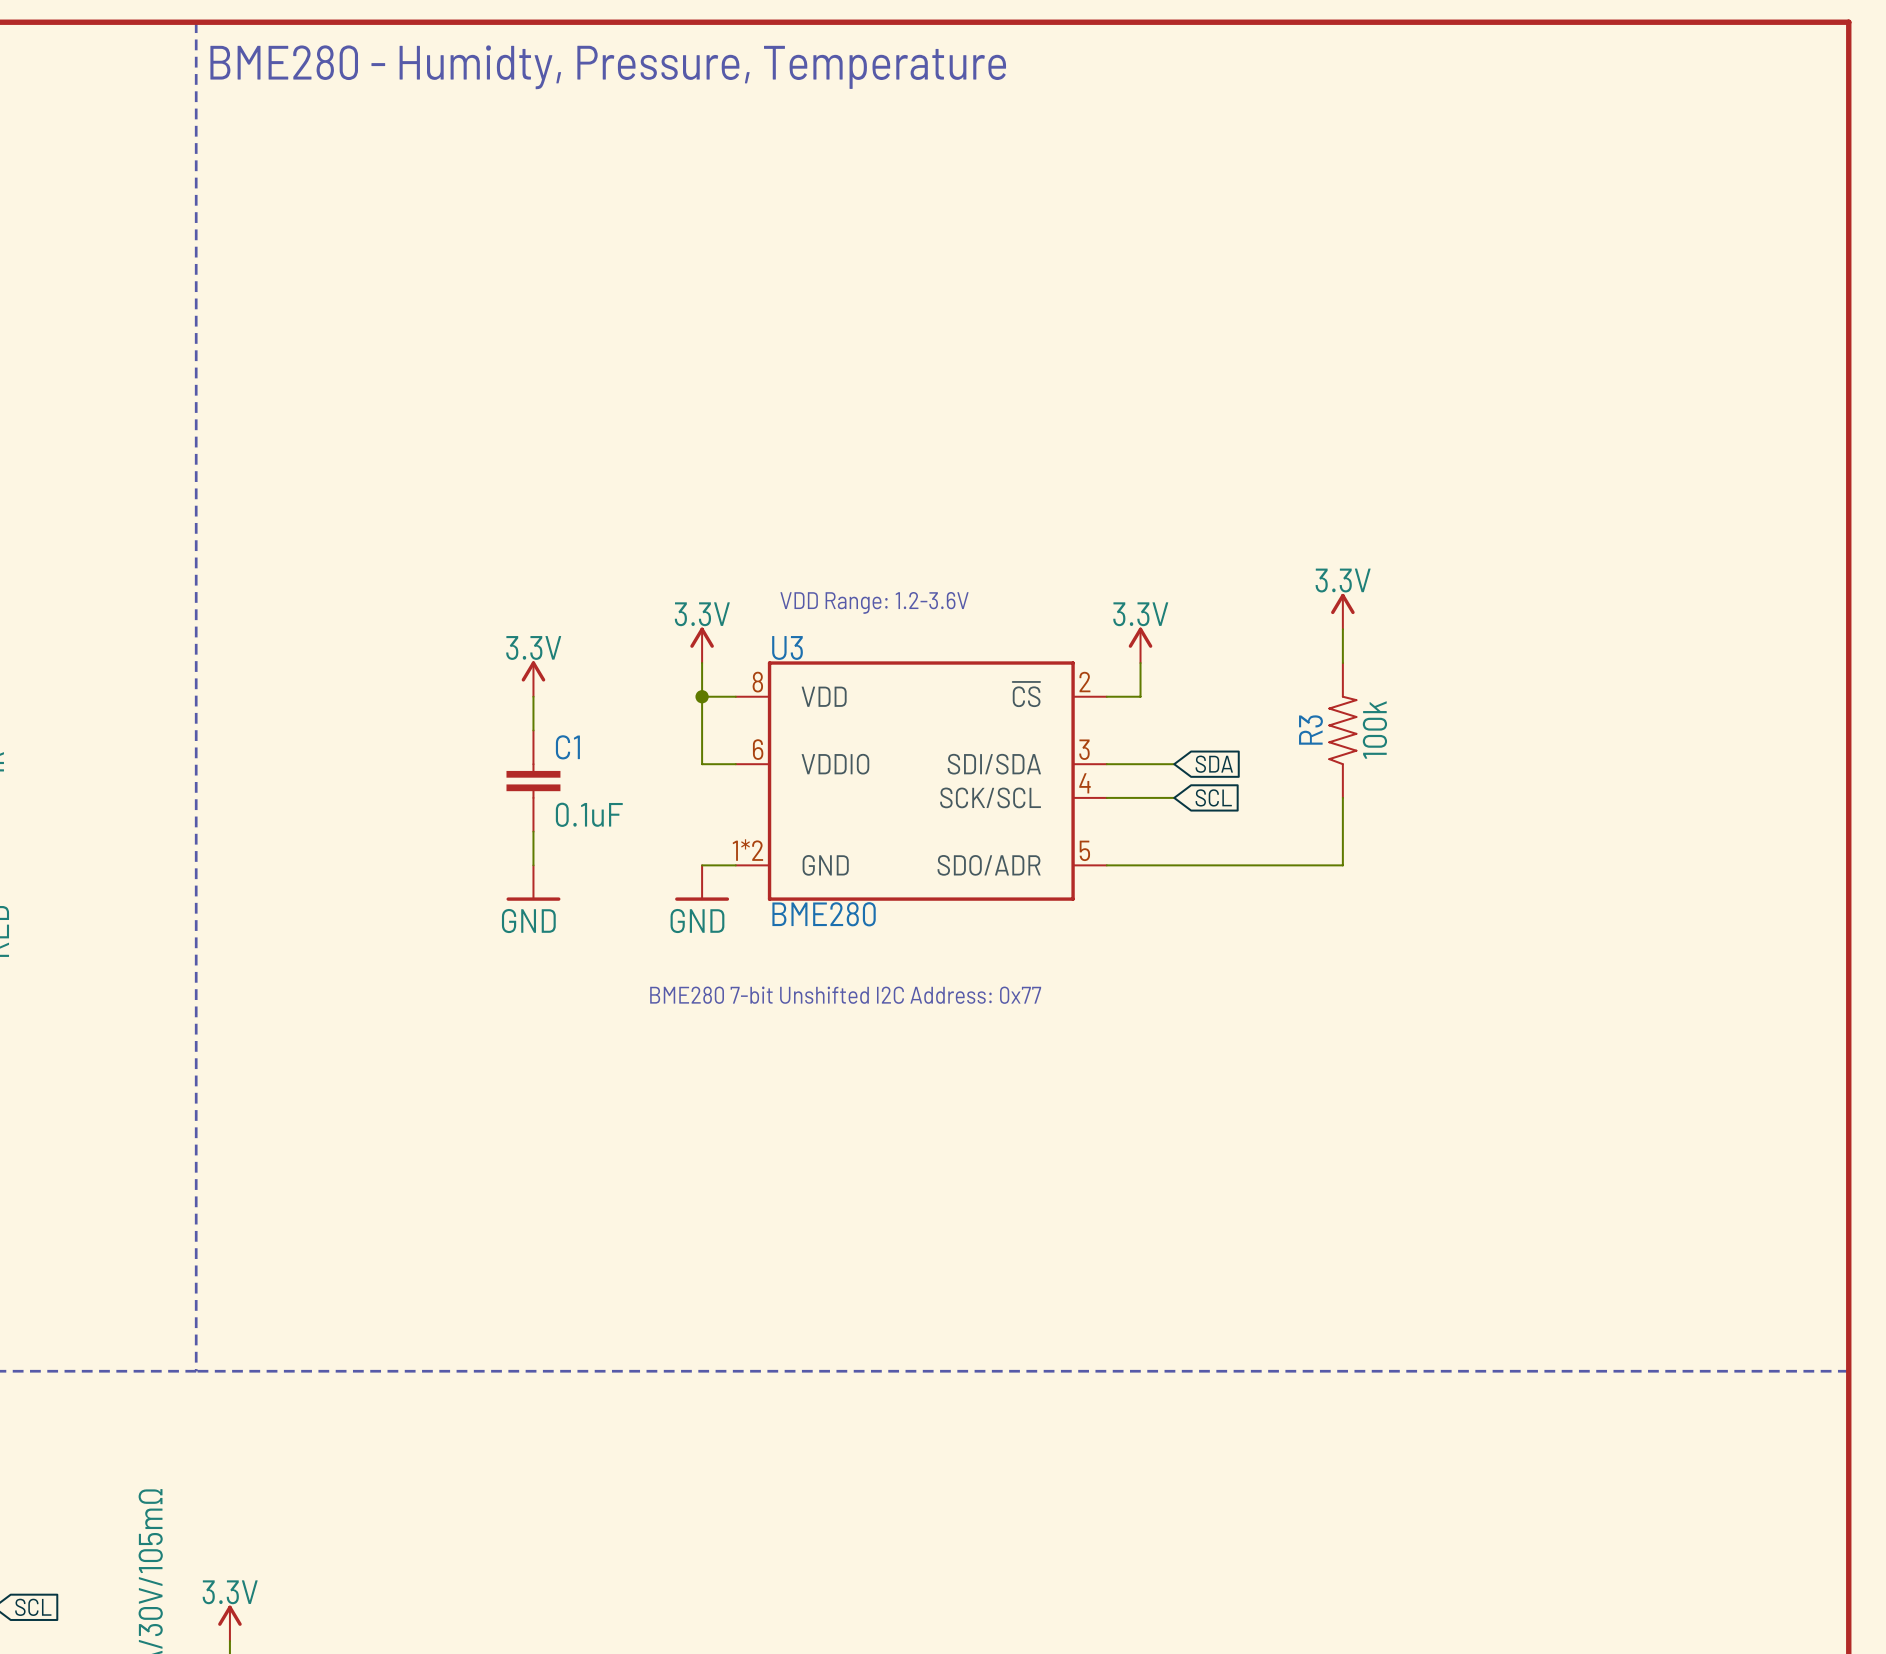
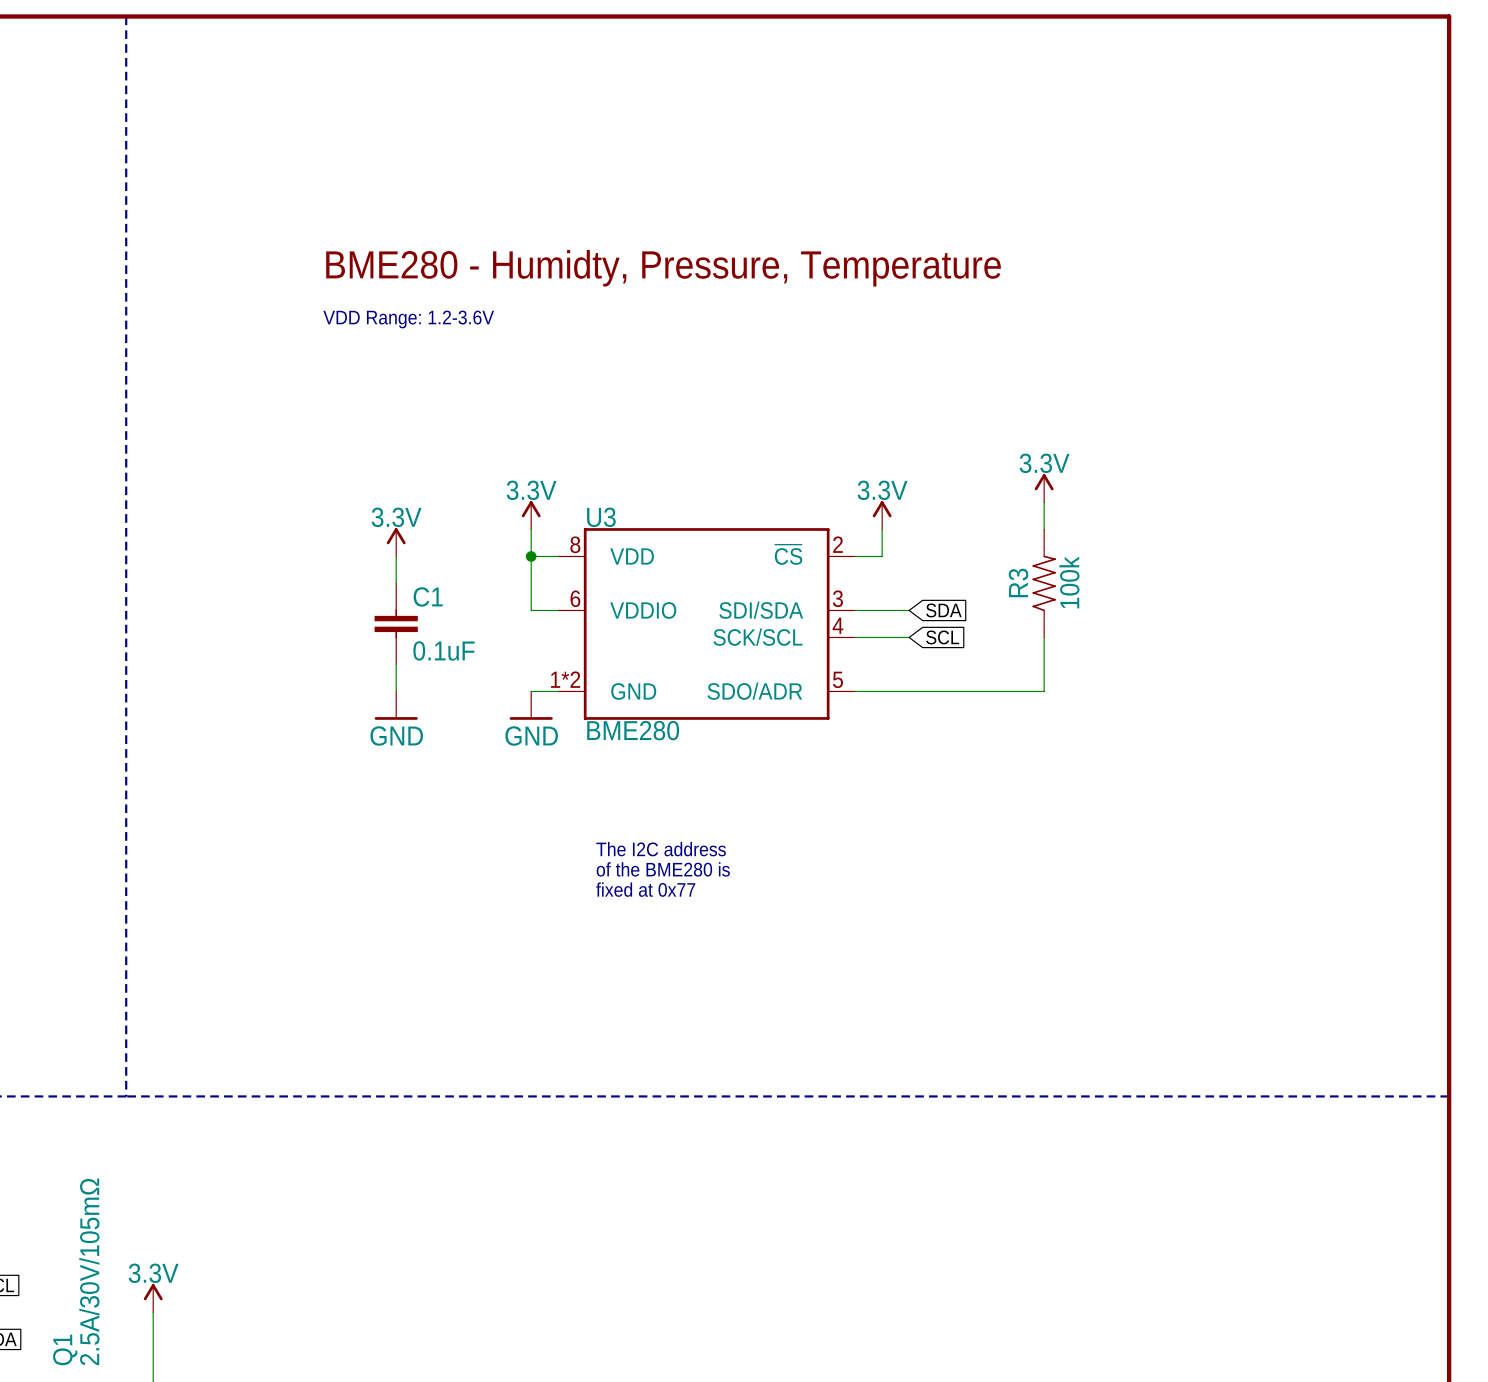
text: BME280 - Humidty, Pressure, Temperature (608, 67) -> none
text: none -> BME280 - Humidty, Pressure, Temperature (663, 268)
text: none -> VDD Range: 1.2-3.6V (408, 319)
text: VDD Range: 1.2-3.6V (874, 602) -> none
text: BME280 7-bit Unshifted I2C Address: 0x77 (845, 995) -> none
text: none -> The I2C address (661, 849)
text: none -> of the BME280 is (663, 869)
text: none -> fixed at 0x77 (645, 889)

